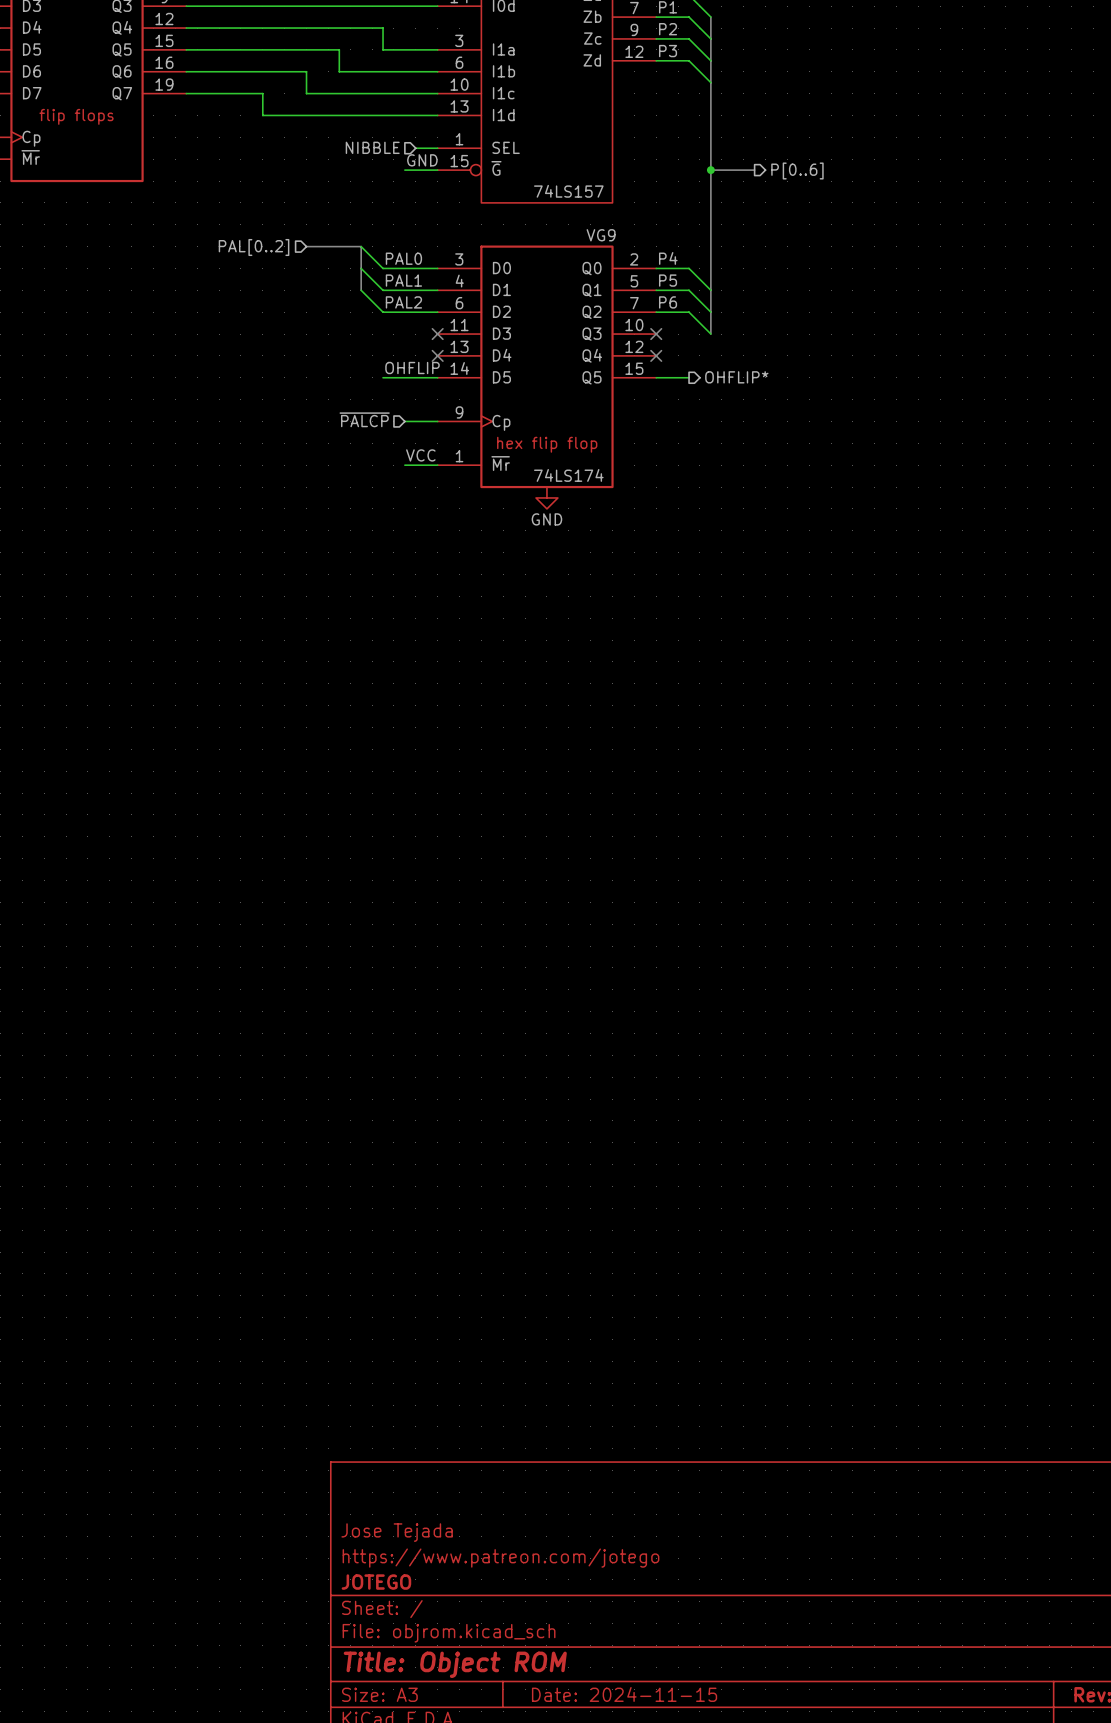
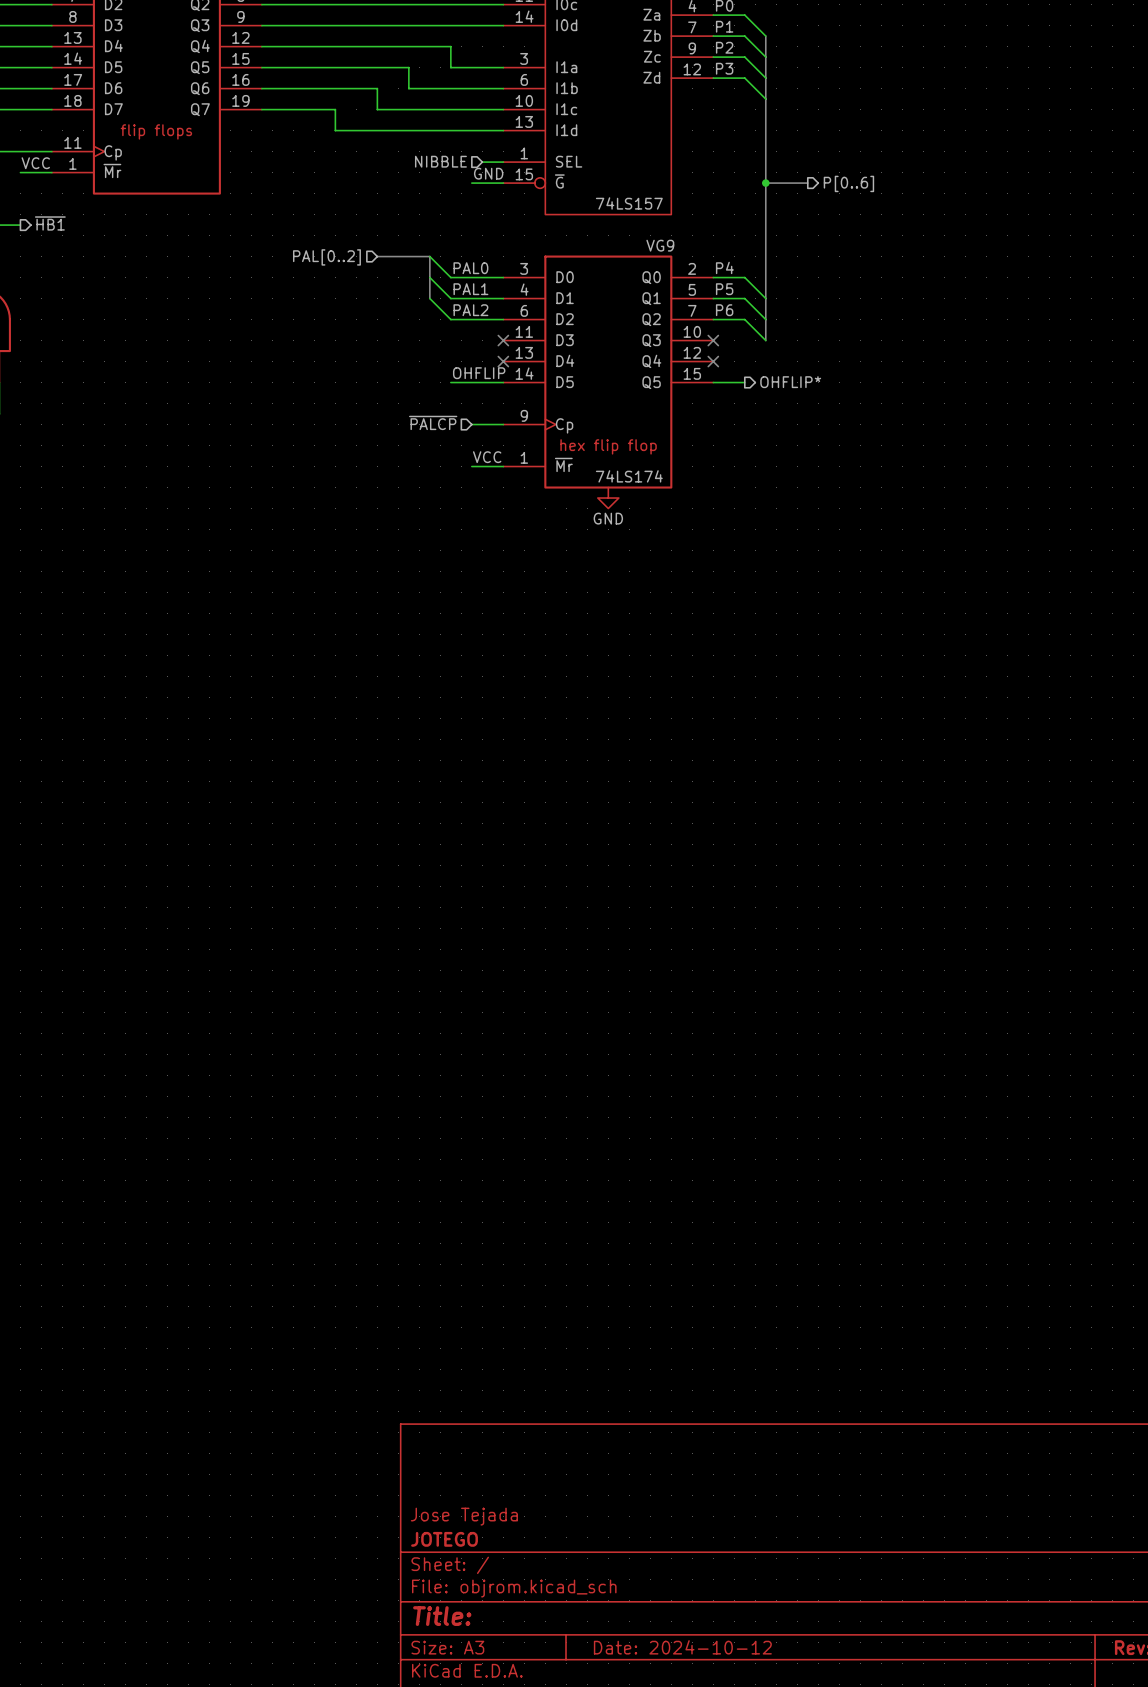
title block: Jose Tejada (397, 1532) -> none
title block: https://www.patreon.com/jotego (500, 1558) -> Jose Tejada (464, 1516)
title block: Title: Object ROM (455, 1664) -> Title: (442, 1616)
title block: Date: 2024-11-15 (624, 1694) -> Date: 2024-10-12 (682, 1647)

